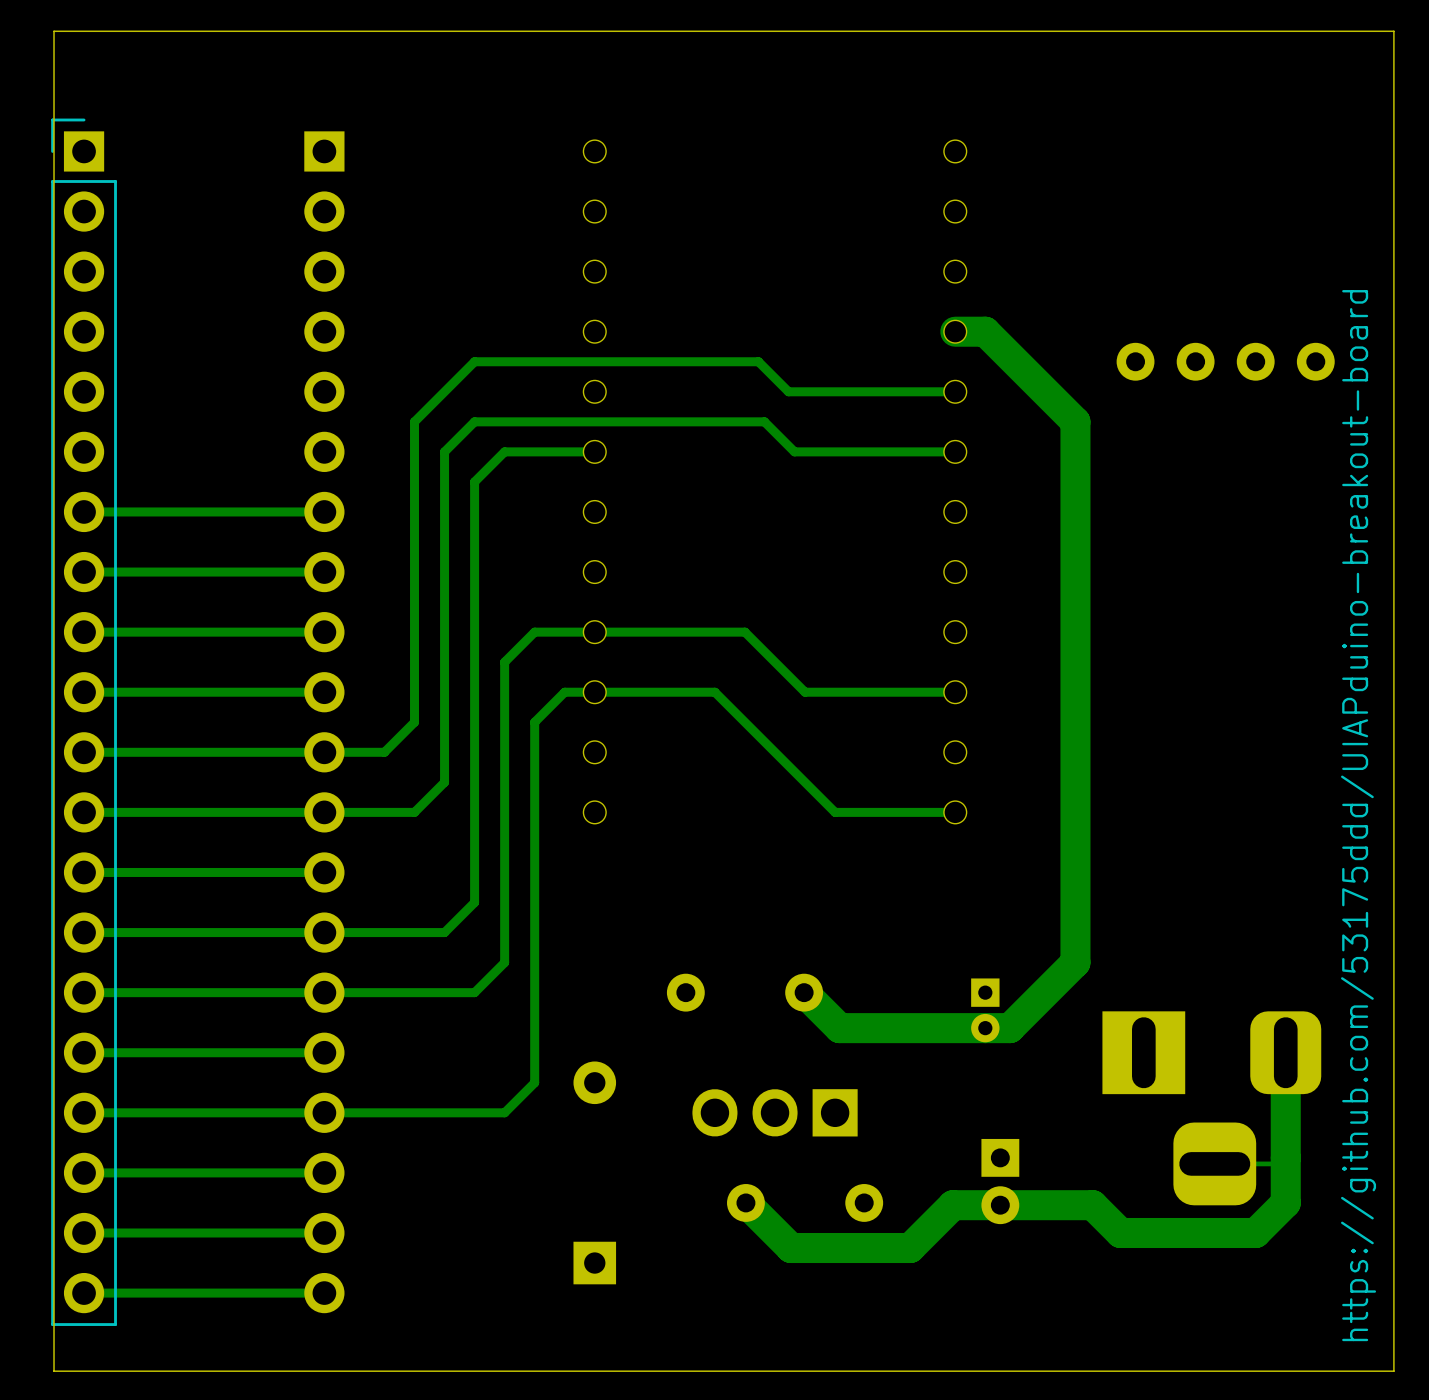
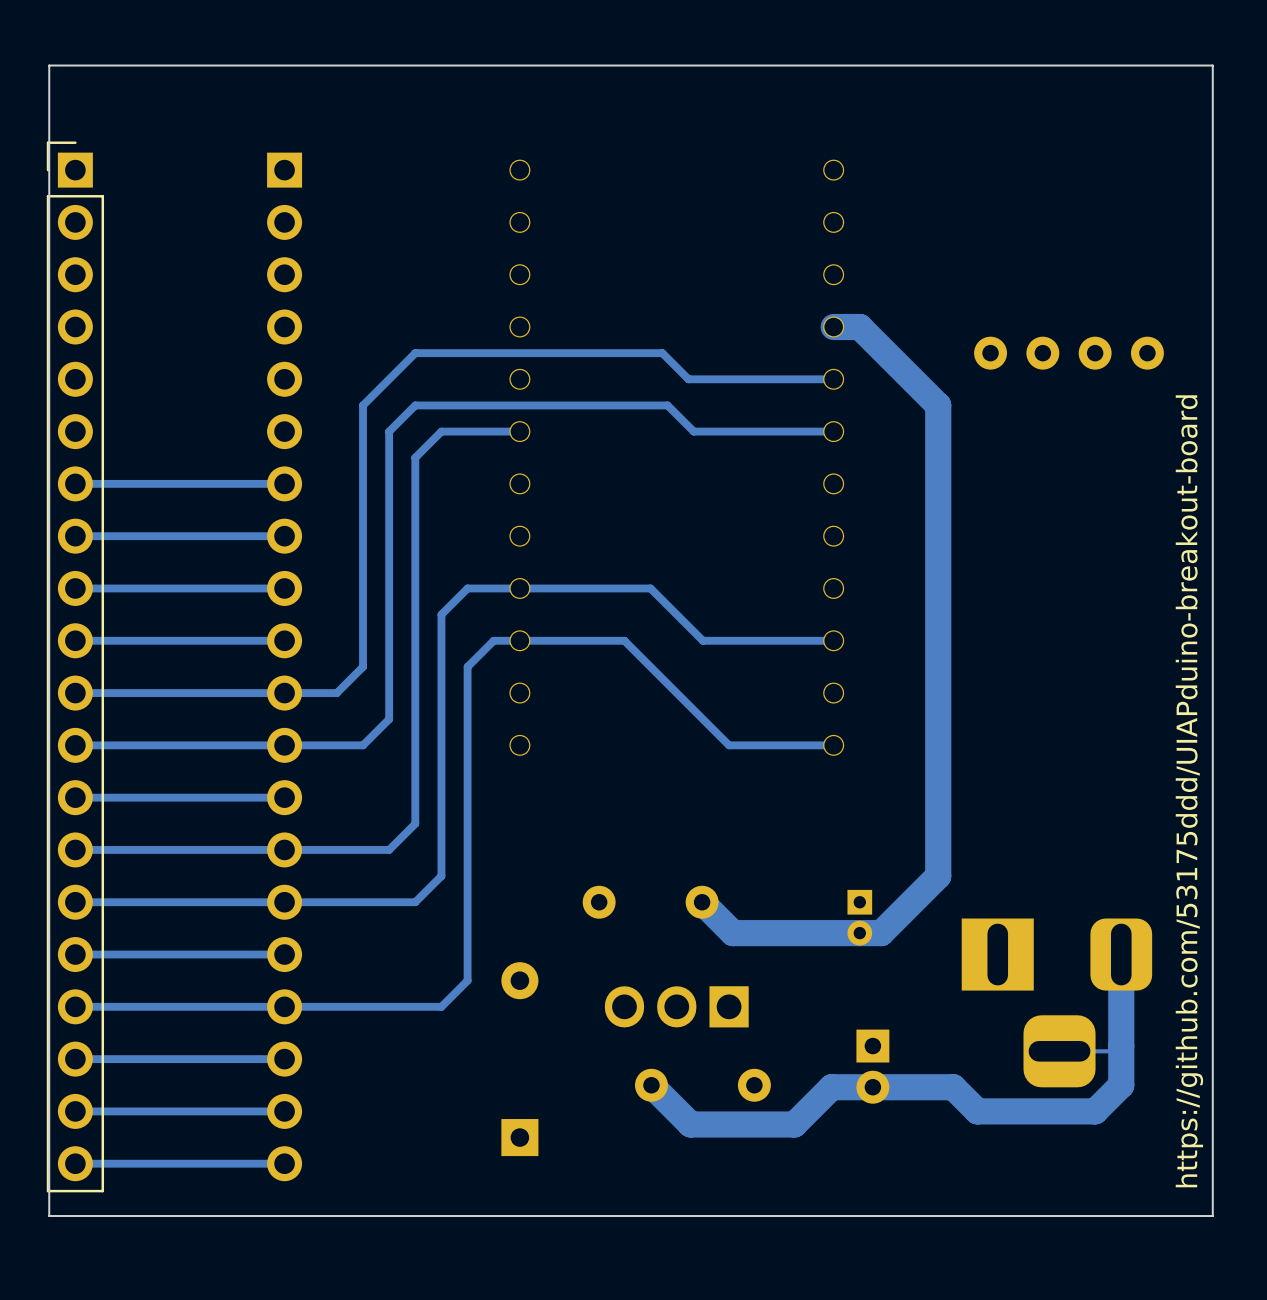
board edge: (1390, 31) (1393, 31) (1393, 1371) (54, 1371) (54, 1353) -> (1212, 65) (1212, 1216) (49, 1216)
text position: https://github.com/53175ddd/UIAPduino-breakout-board (1358, 815) -> https://github.com/53175ddd/UIAPduino-breakout-board (1189, 791)

